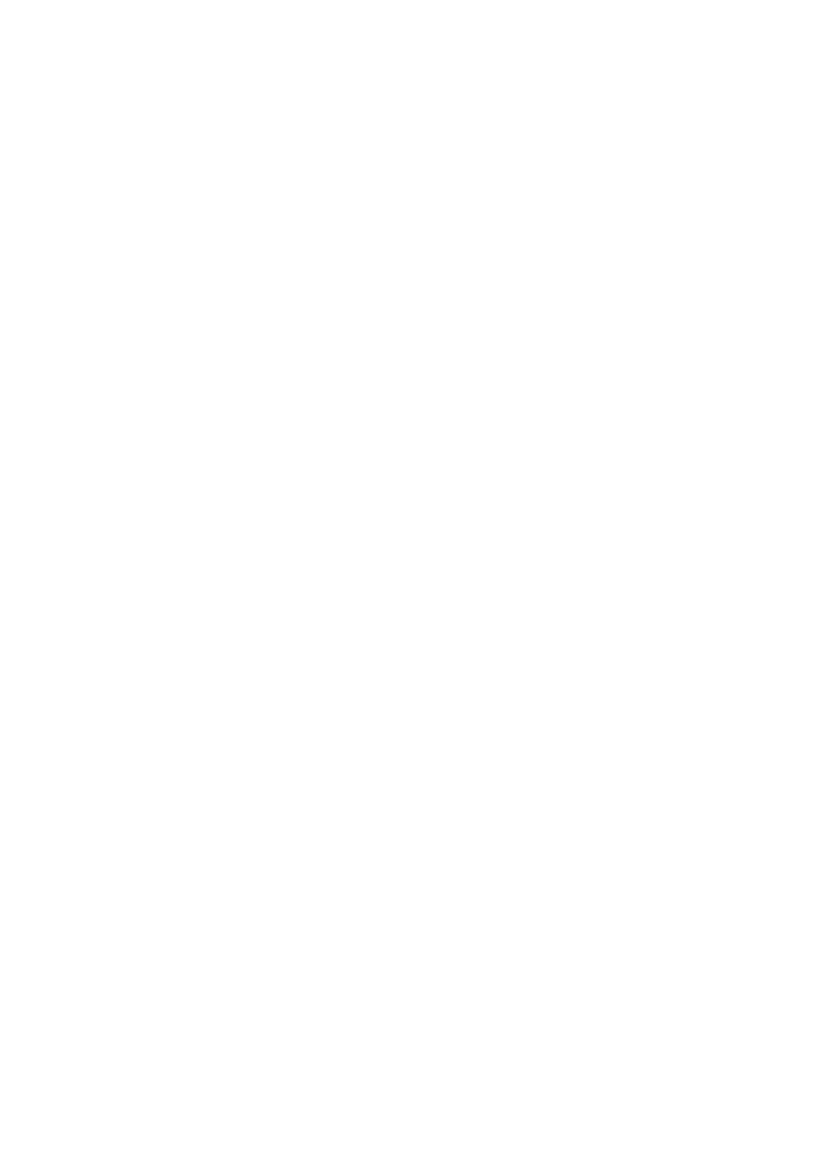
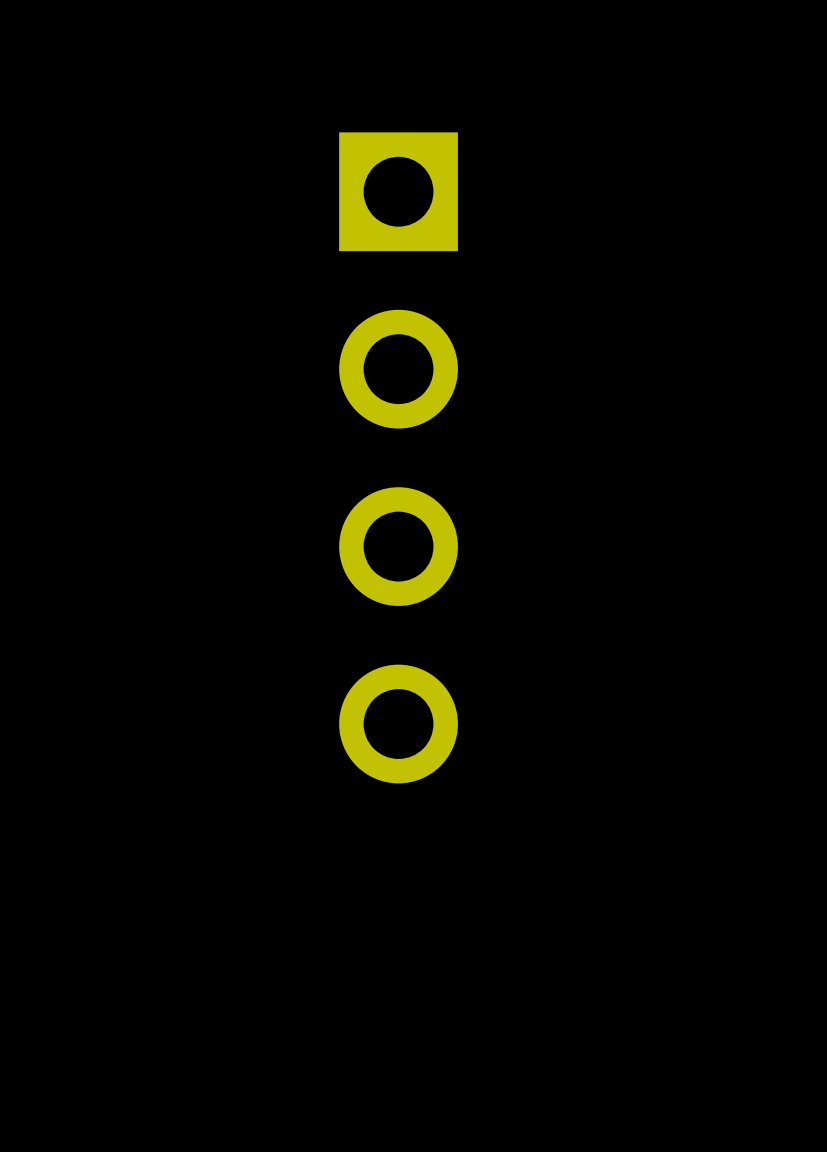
part: none -> (398, 457)

